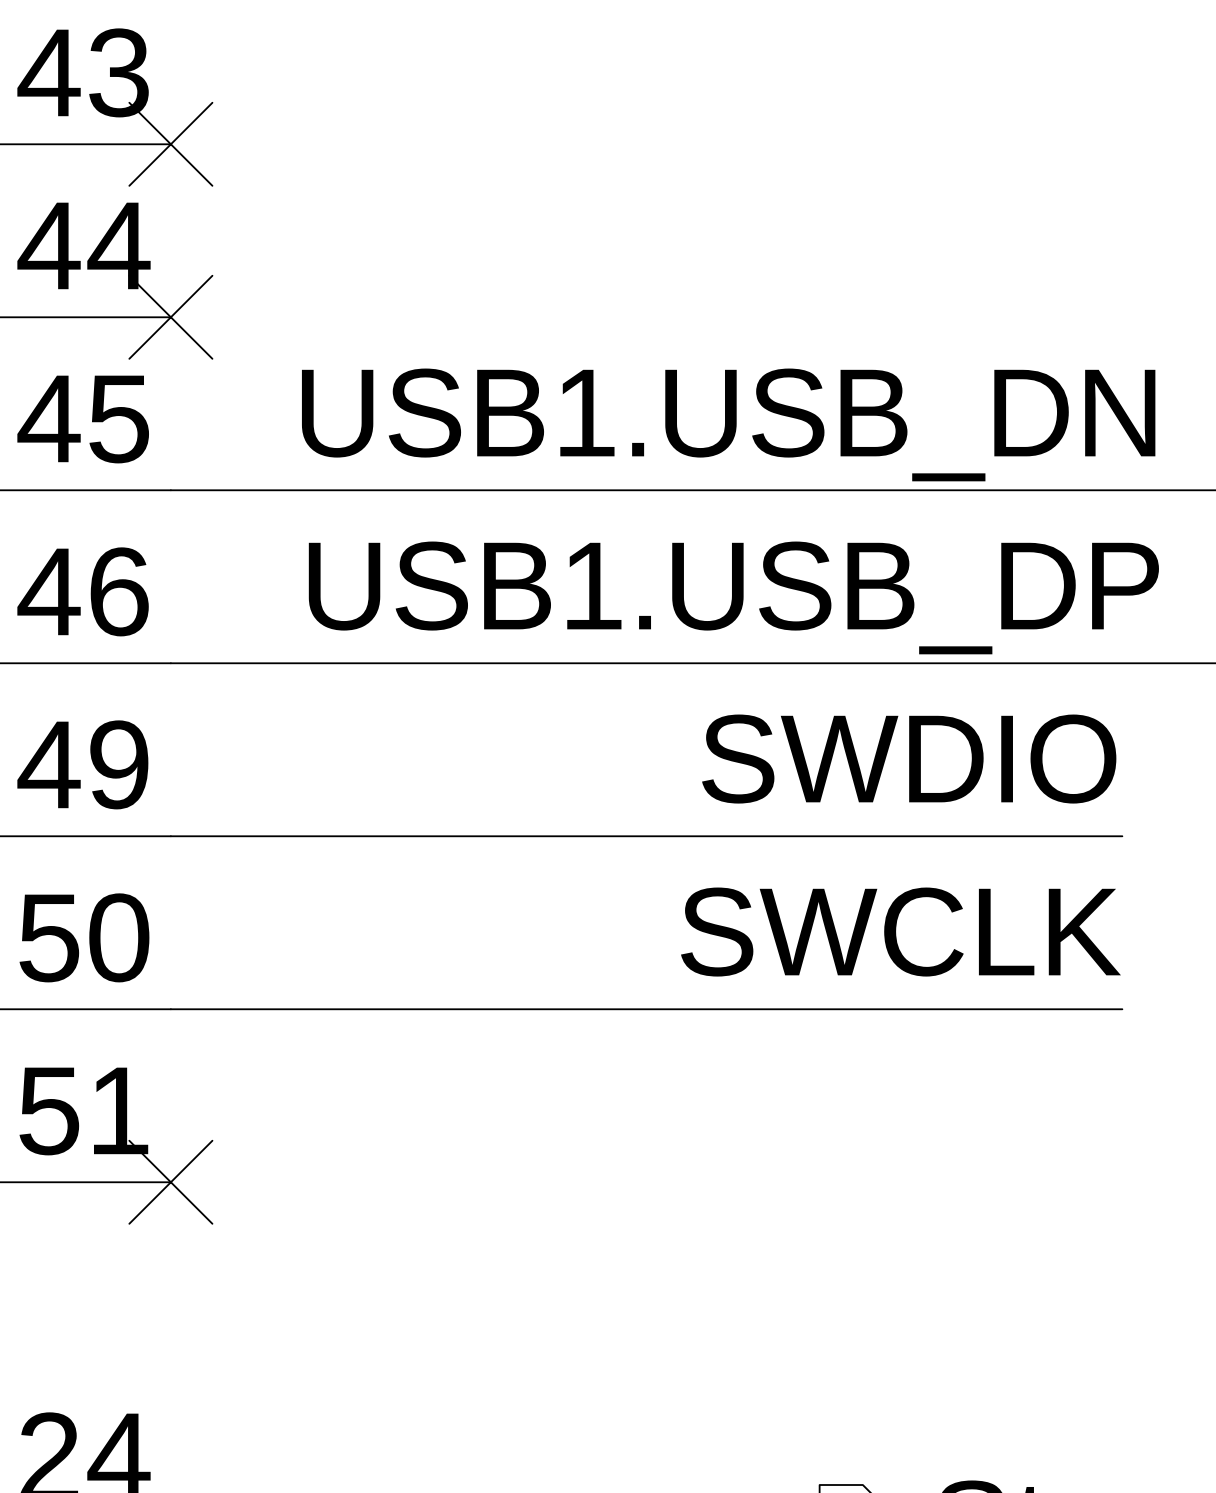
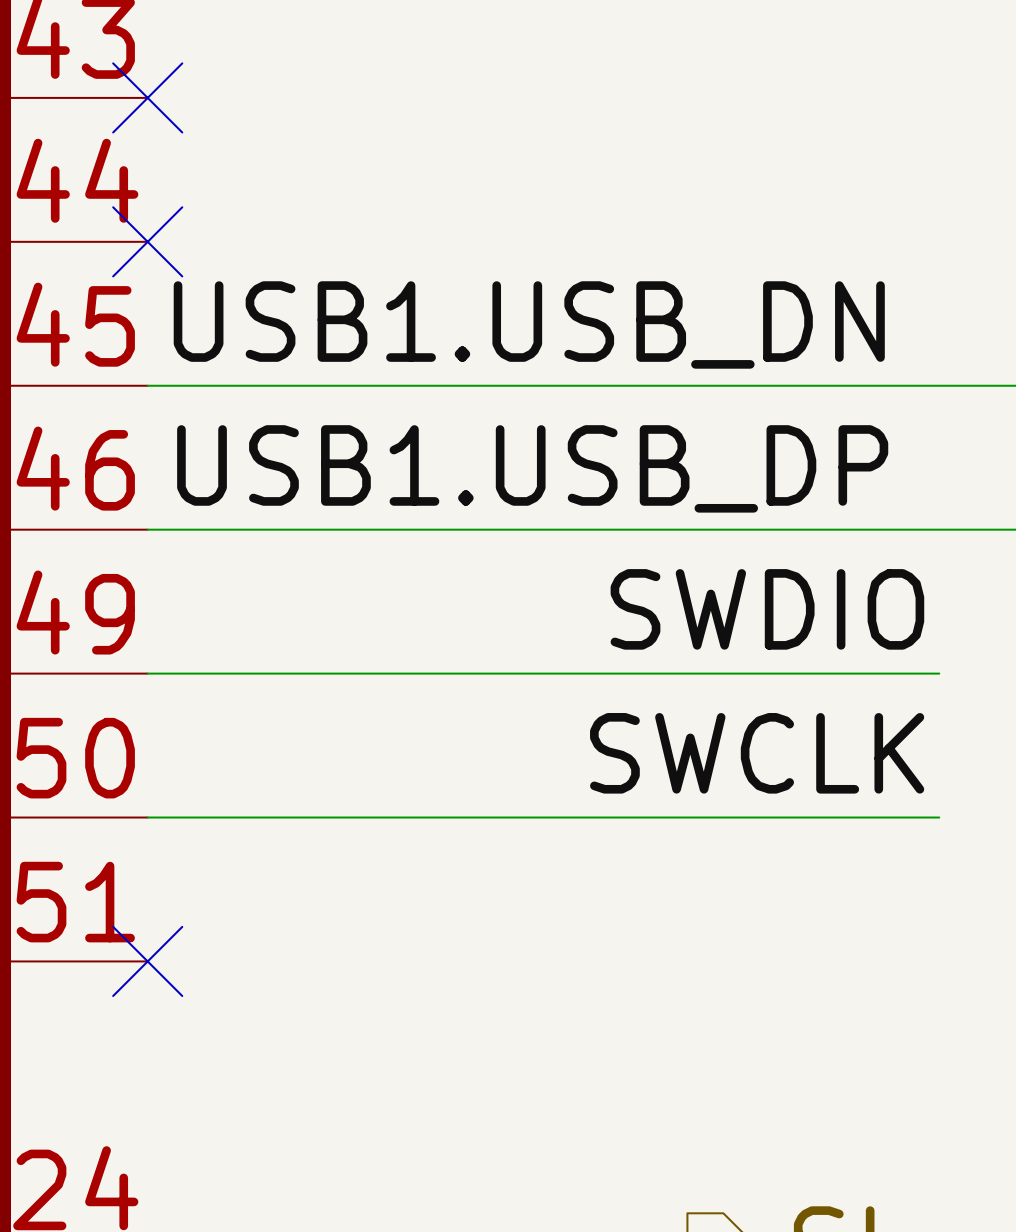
label position: USB1.USB_DN (728, 424) -> USB1.USB_DN (529, 324)
label position: USB1.USB_DP (733, 597) -> USB1.USB_DP (532, 468)

